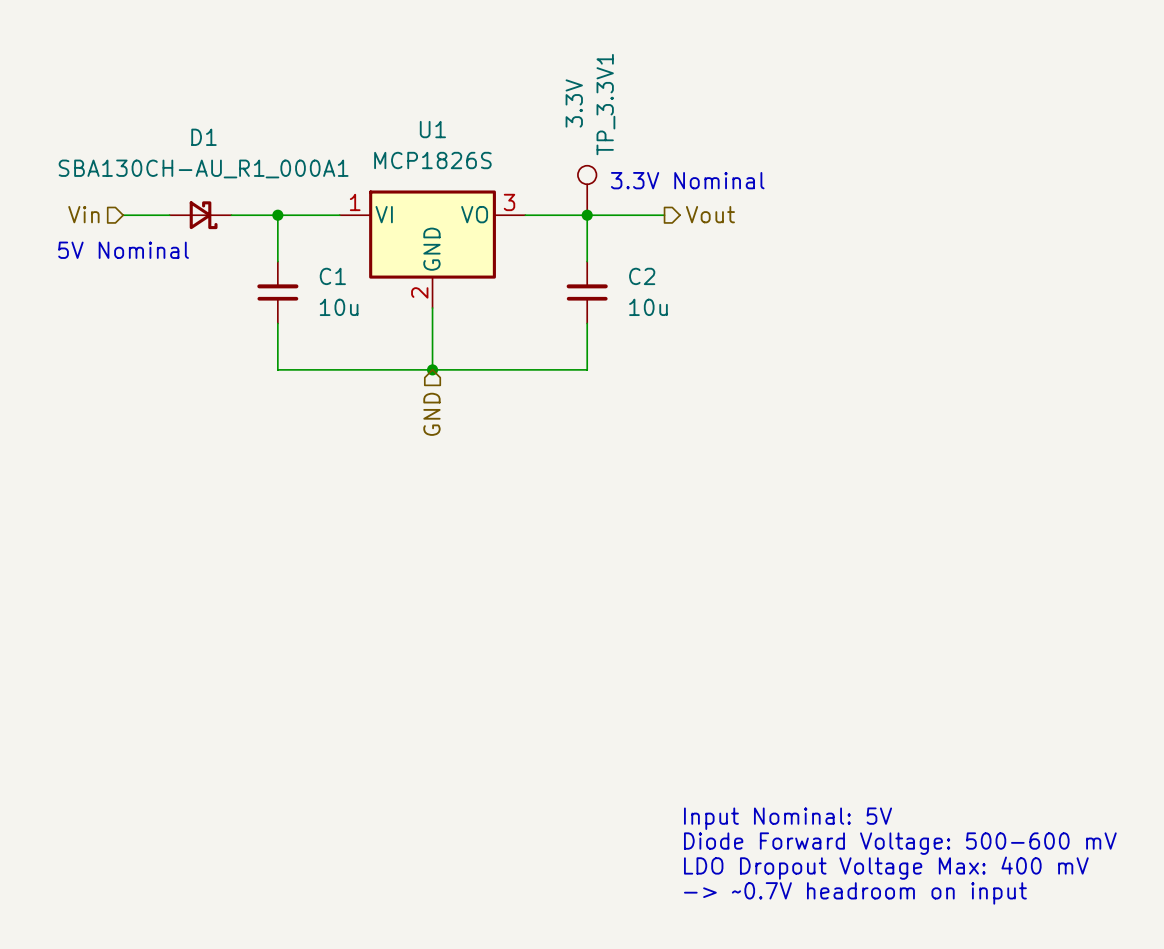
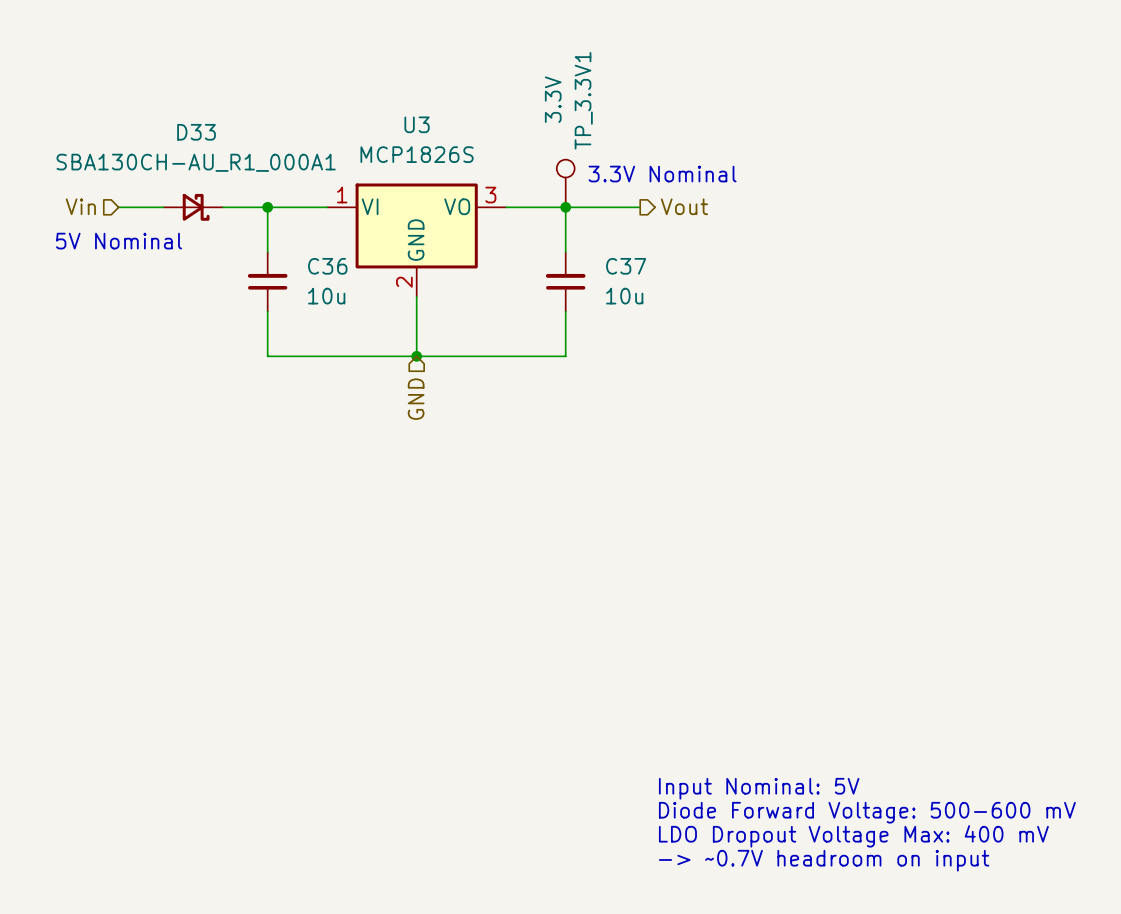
U1 name: U1 (432, 129) -> U3 (417, 124)
D1 name: D1 (203, 137) -> D33 (196, 132)
C1 name: C1 (332, 276) -> C36 (327, 266)
C2 name: C2 (642, 276) -> C37 (626, 266)

